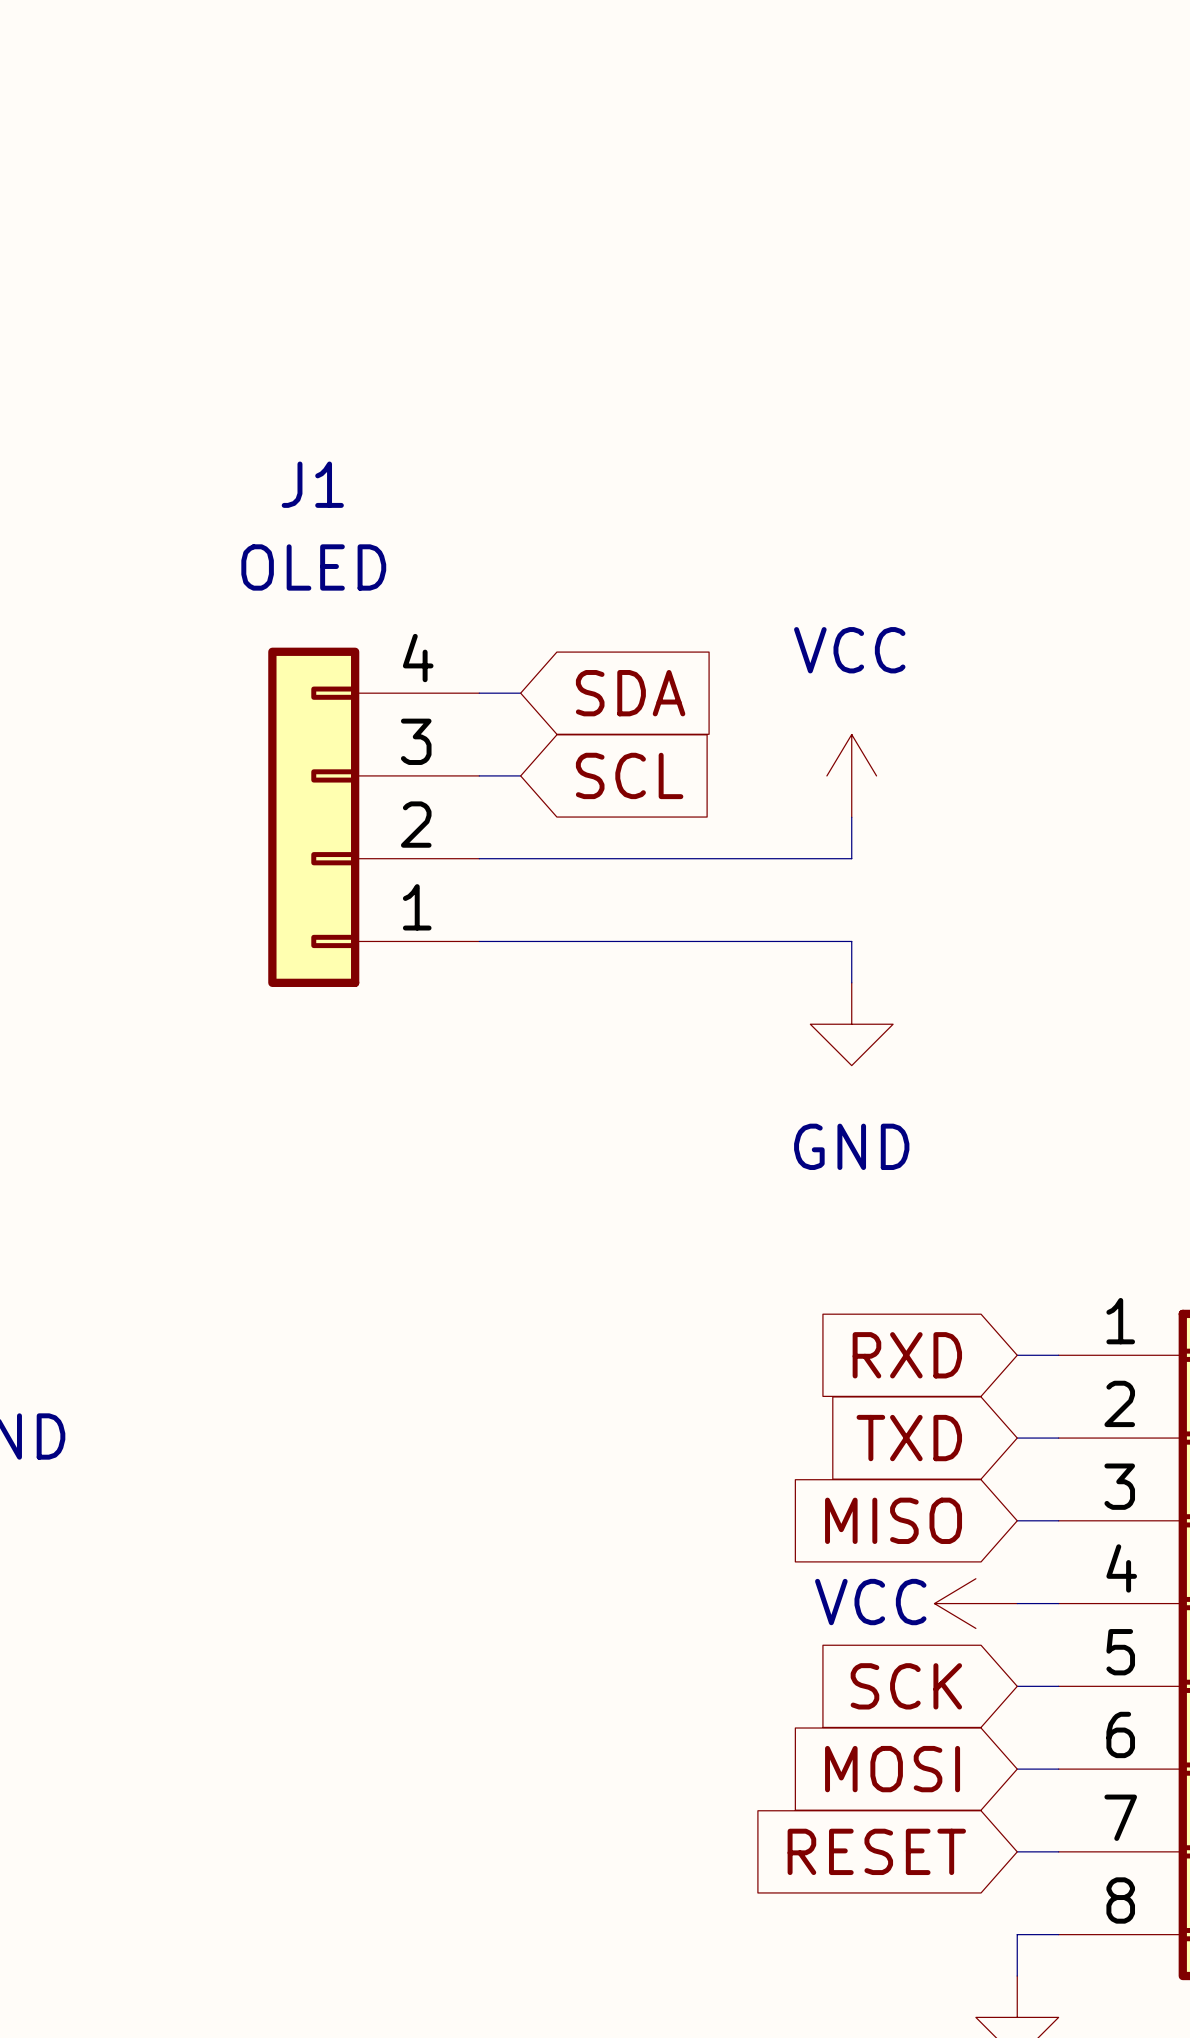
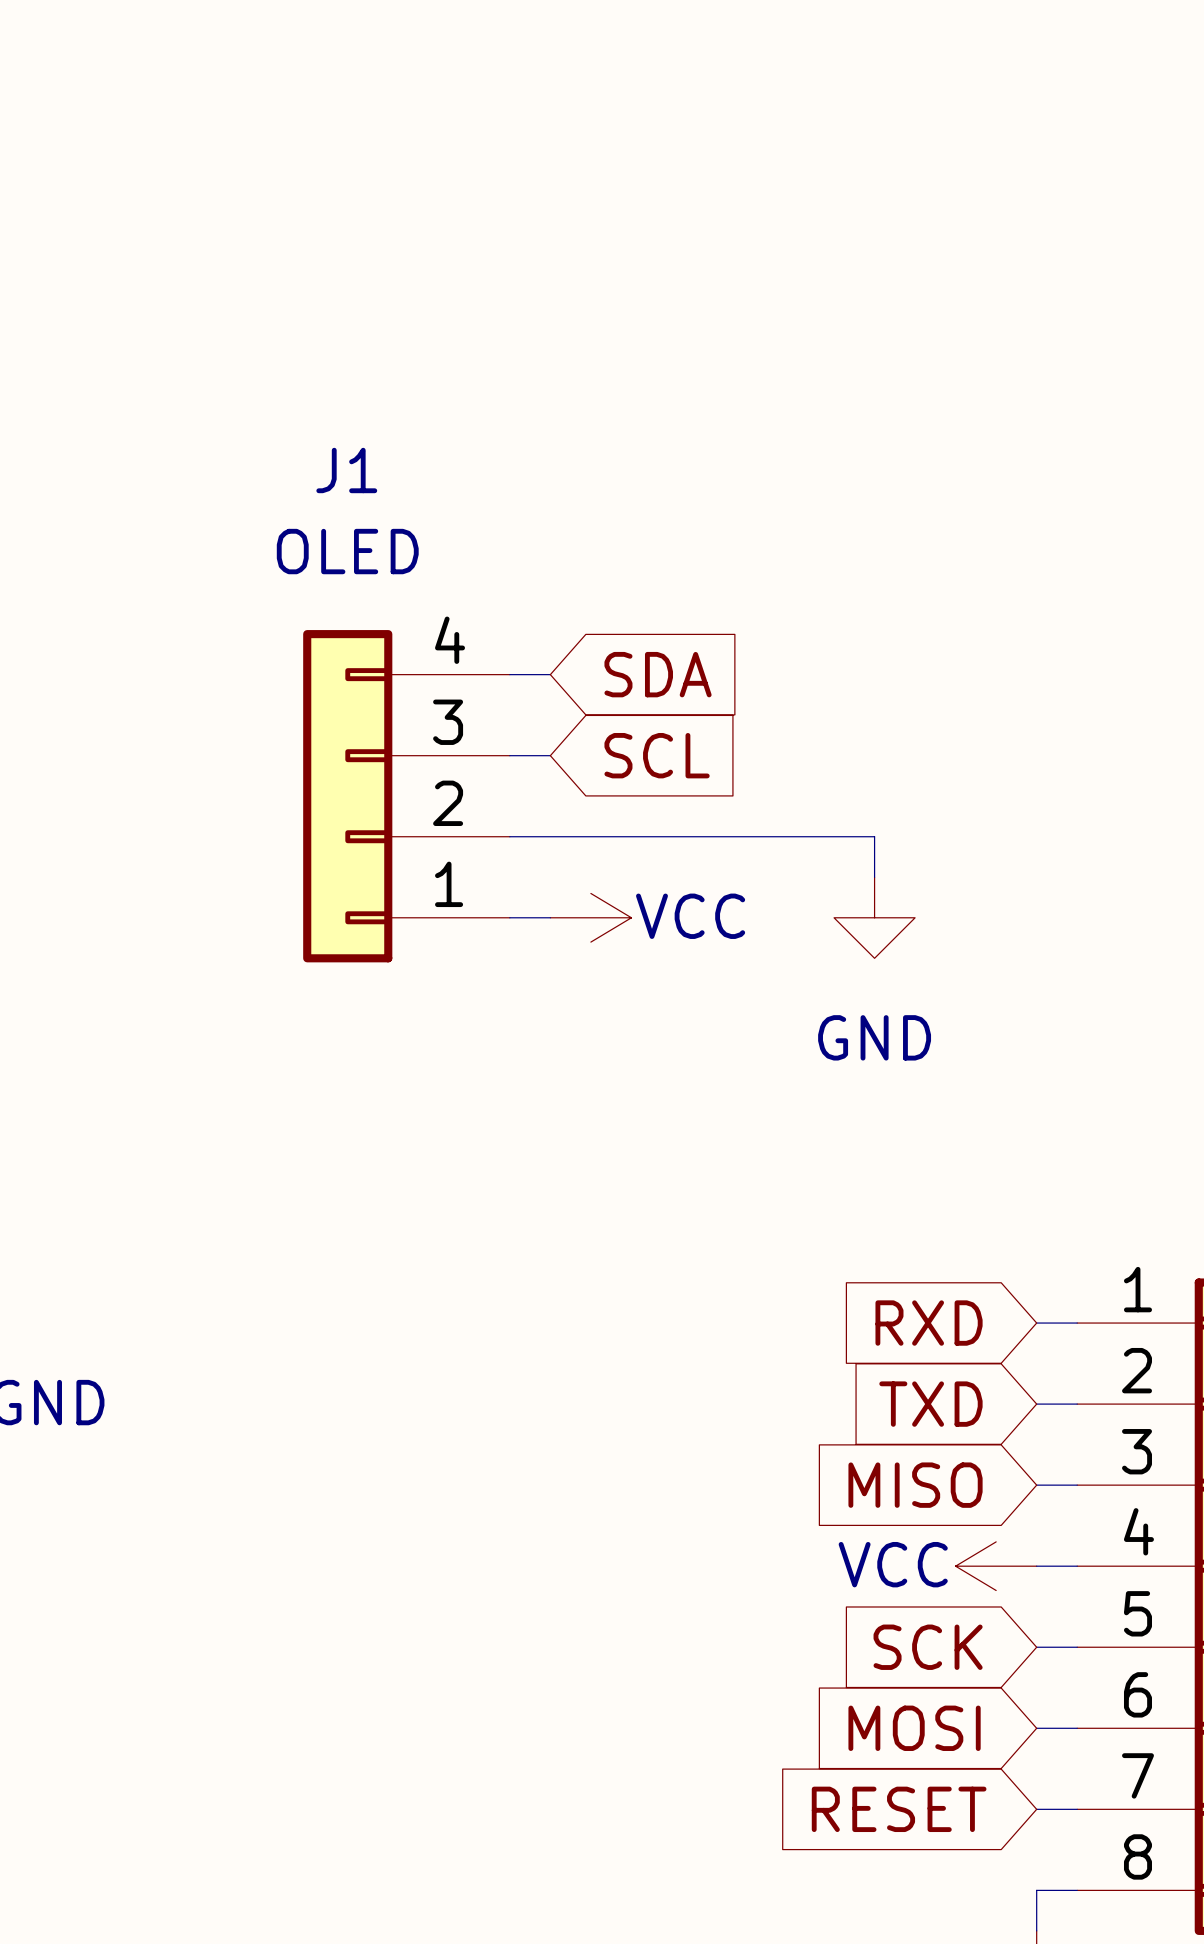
power symbol rotation: 0° (851, 775) -> 90° clockwise (590, 917)
power symbol position: VCC (851, 775) -> VCC (590, 917)
wire: (851, 817) (851, 858) -> (874, 877) (874, 836)
wire: (520, 941) (851, 941) (851, 982) -> none
power symbol position: GND (851, 1024) -> GND (874, 917)

